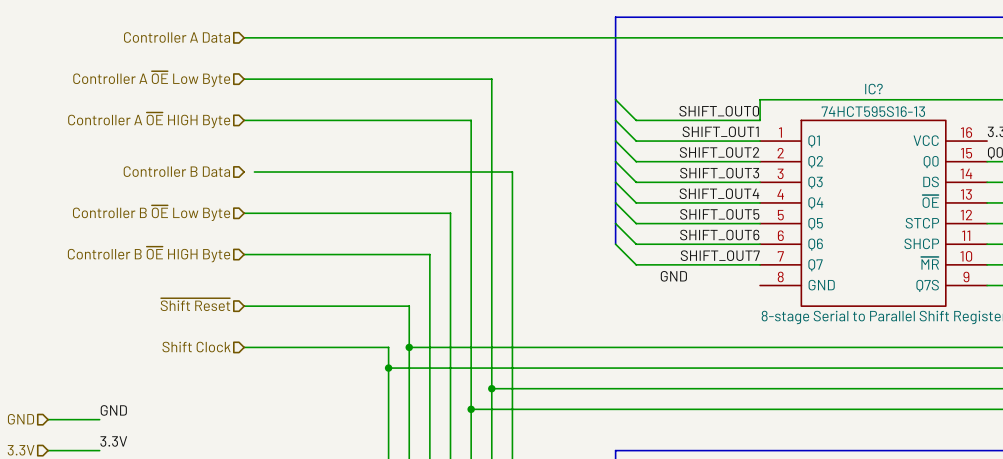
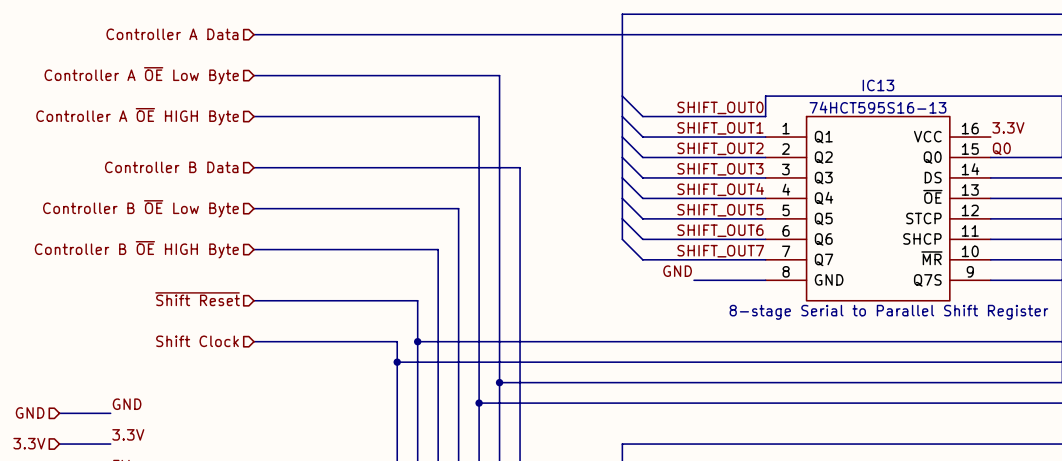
IC? name: IC? (873, 89) -> IC13 (878, 85)
wire: none -> (253, 167) (264, 167)
wire: none -> (694, 280) (765, 280)

